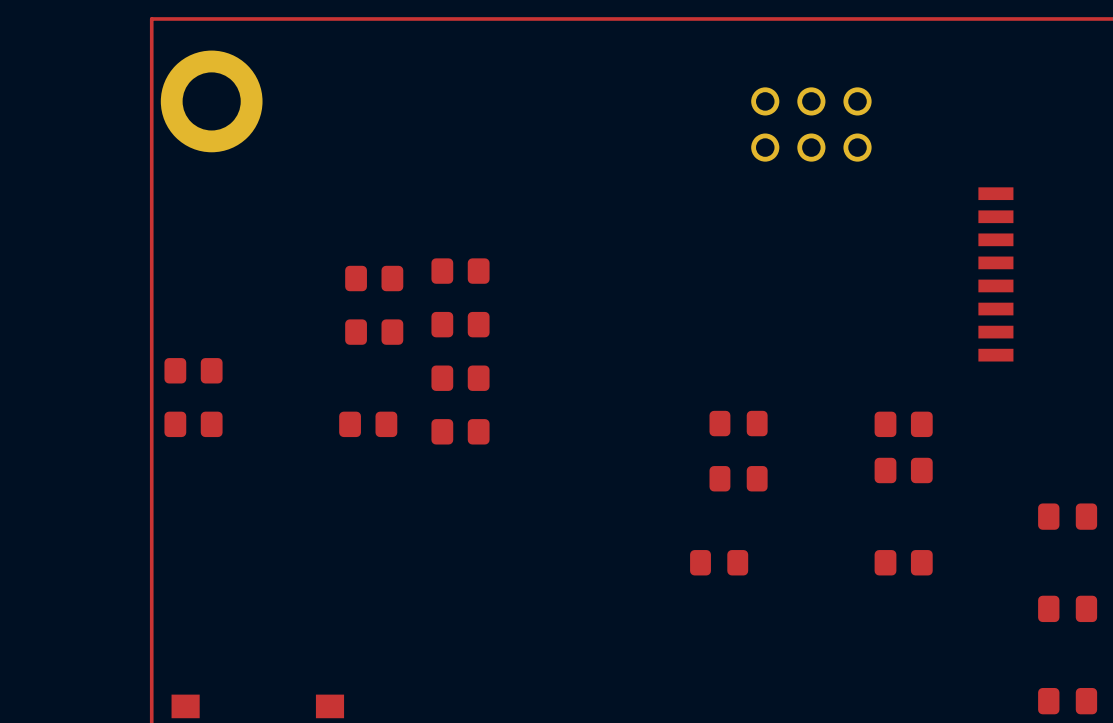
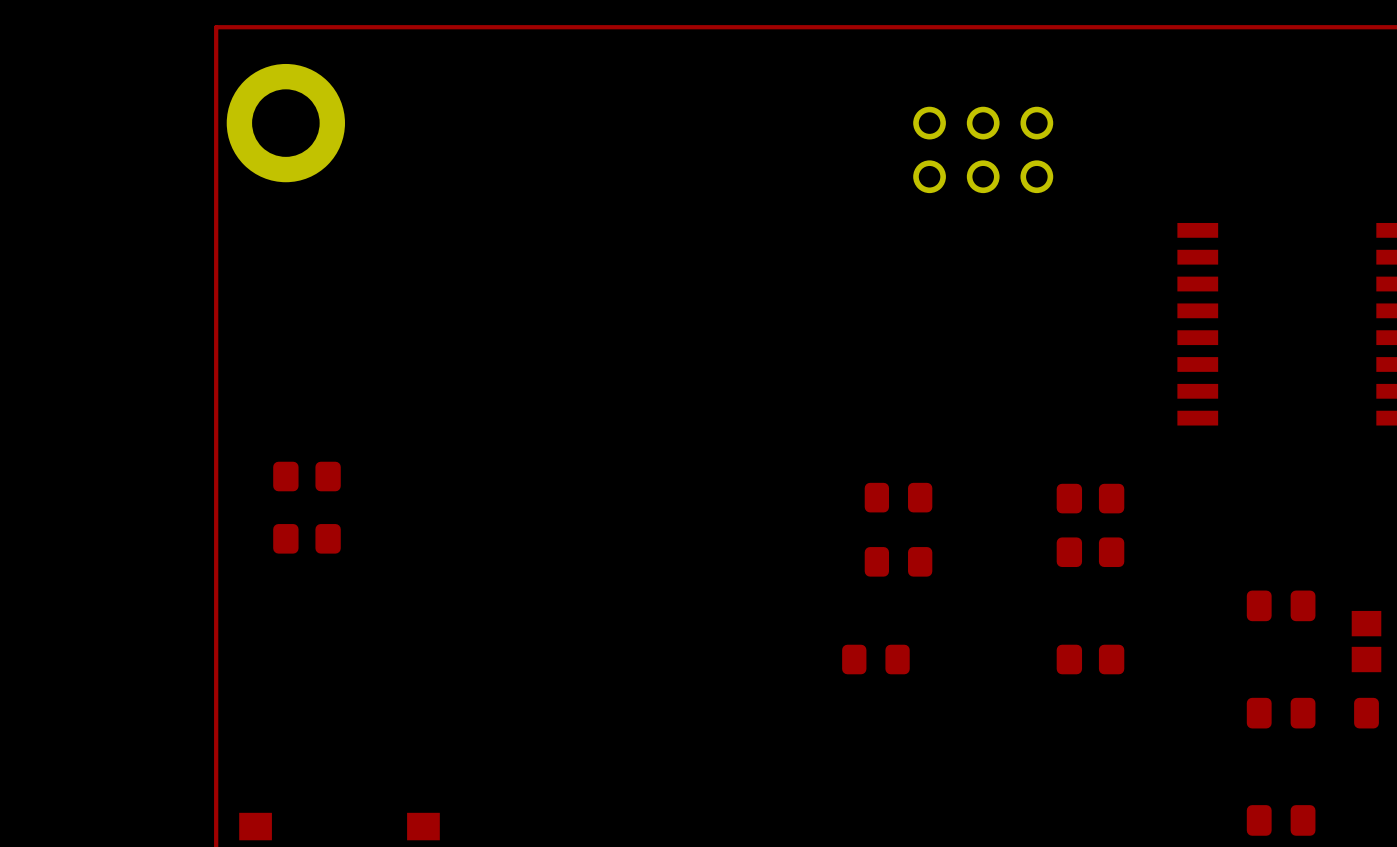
part: (460, 271) -> none
part: (374, 278) -> none
part: (460, 324) -> none
part: (374, 332) -> none
part: (193, 370) -> none
part: (460, 378) -> none
part: none -> (306, 476)
part: (193, 424) -> none
part: (368, 424) -> none
part: (460, 431) -> none
part: none -> (306, 538)

